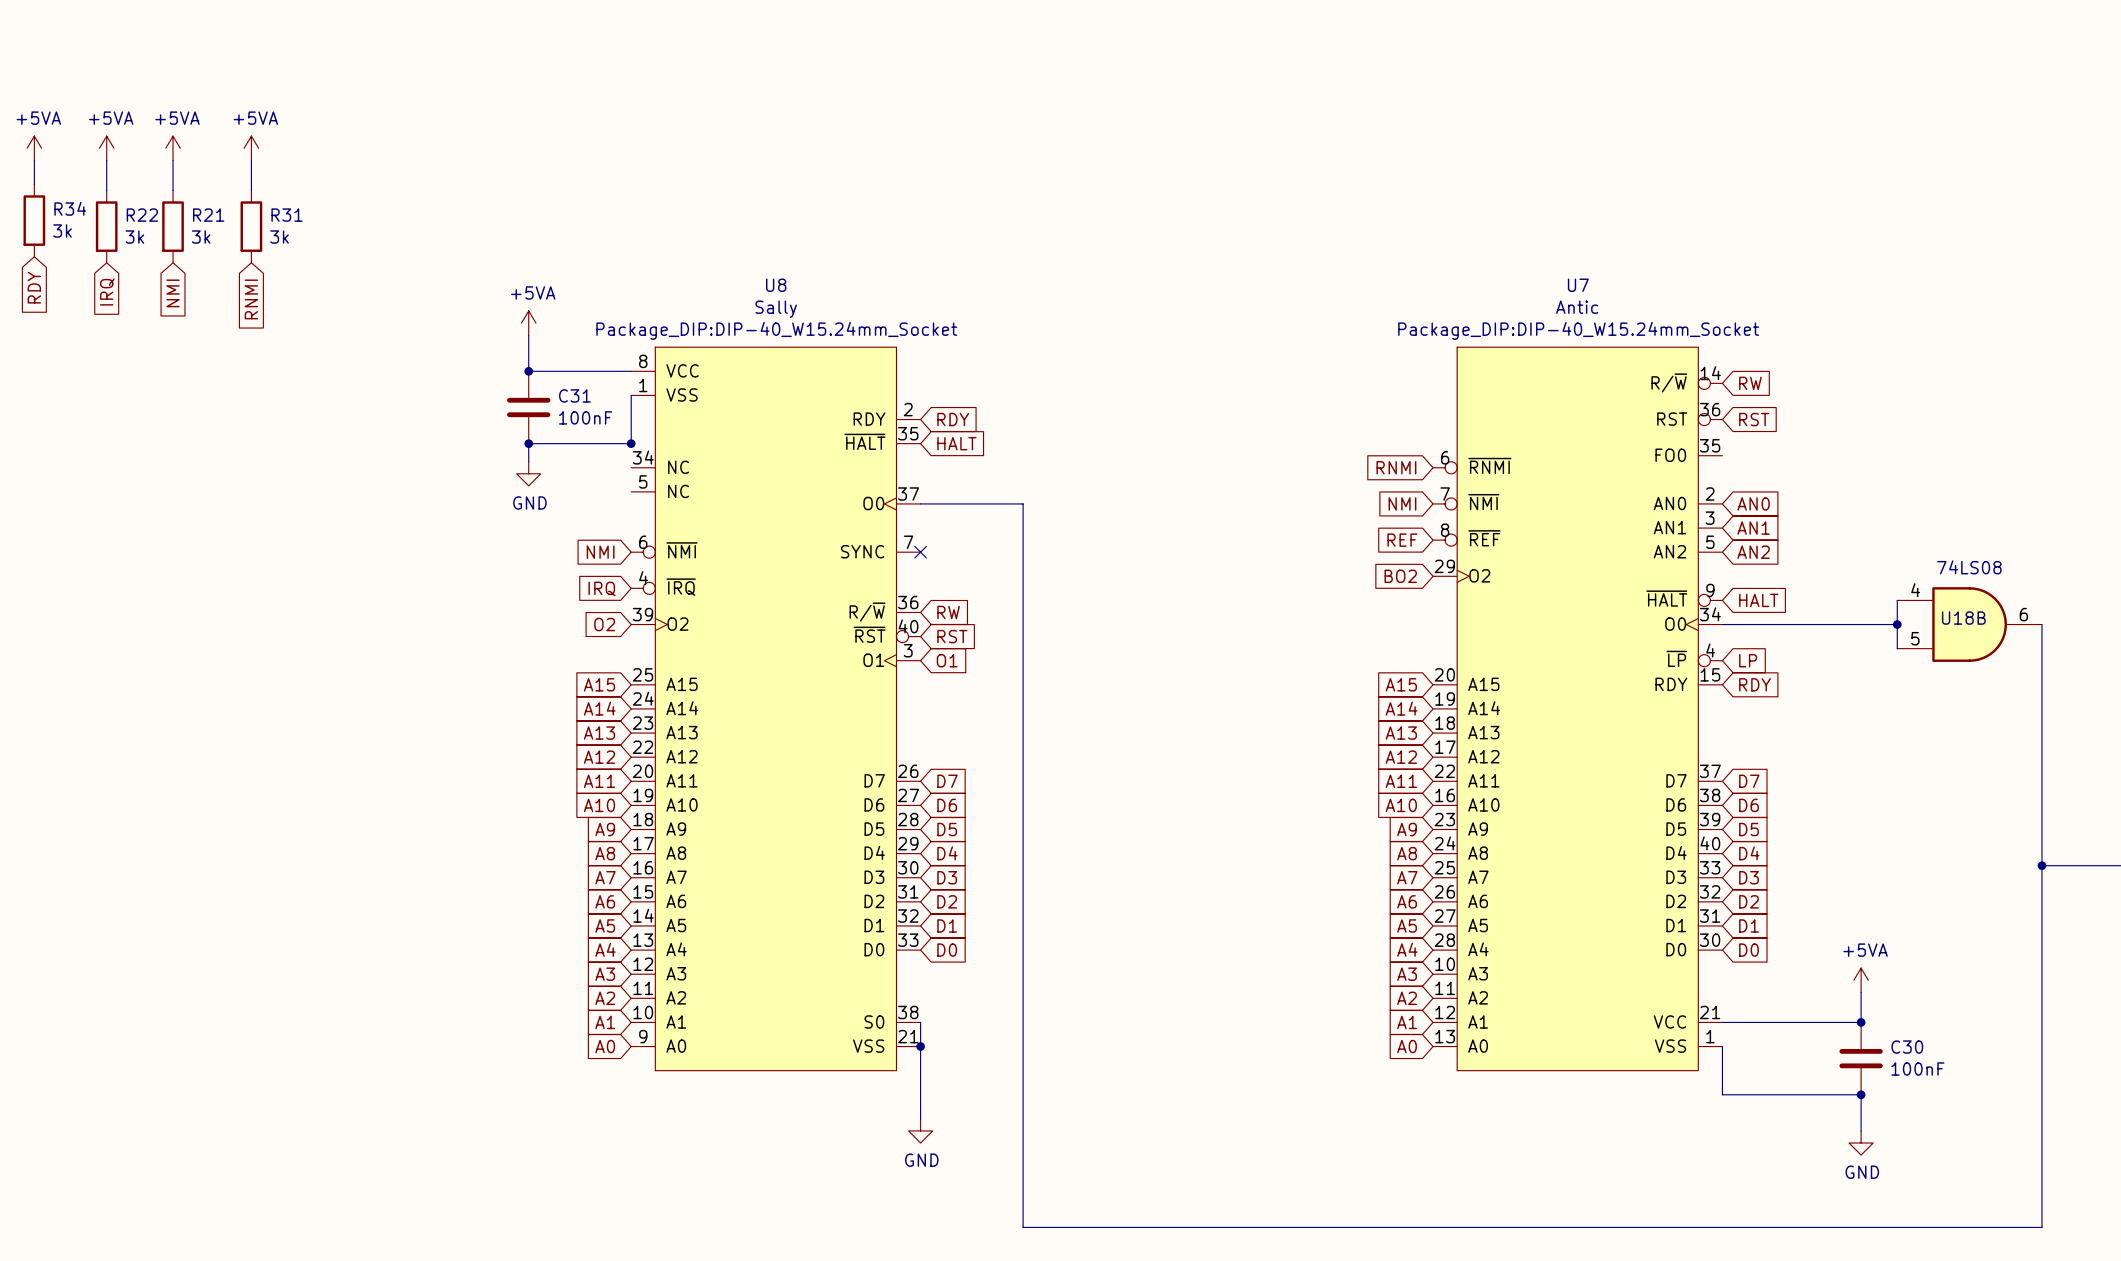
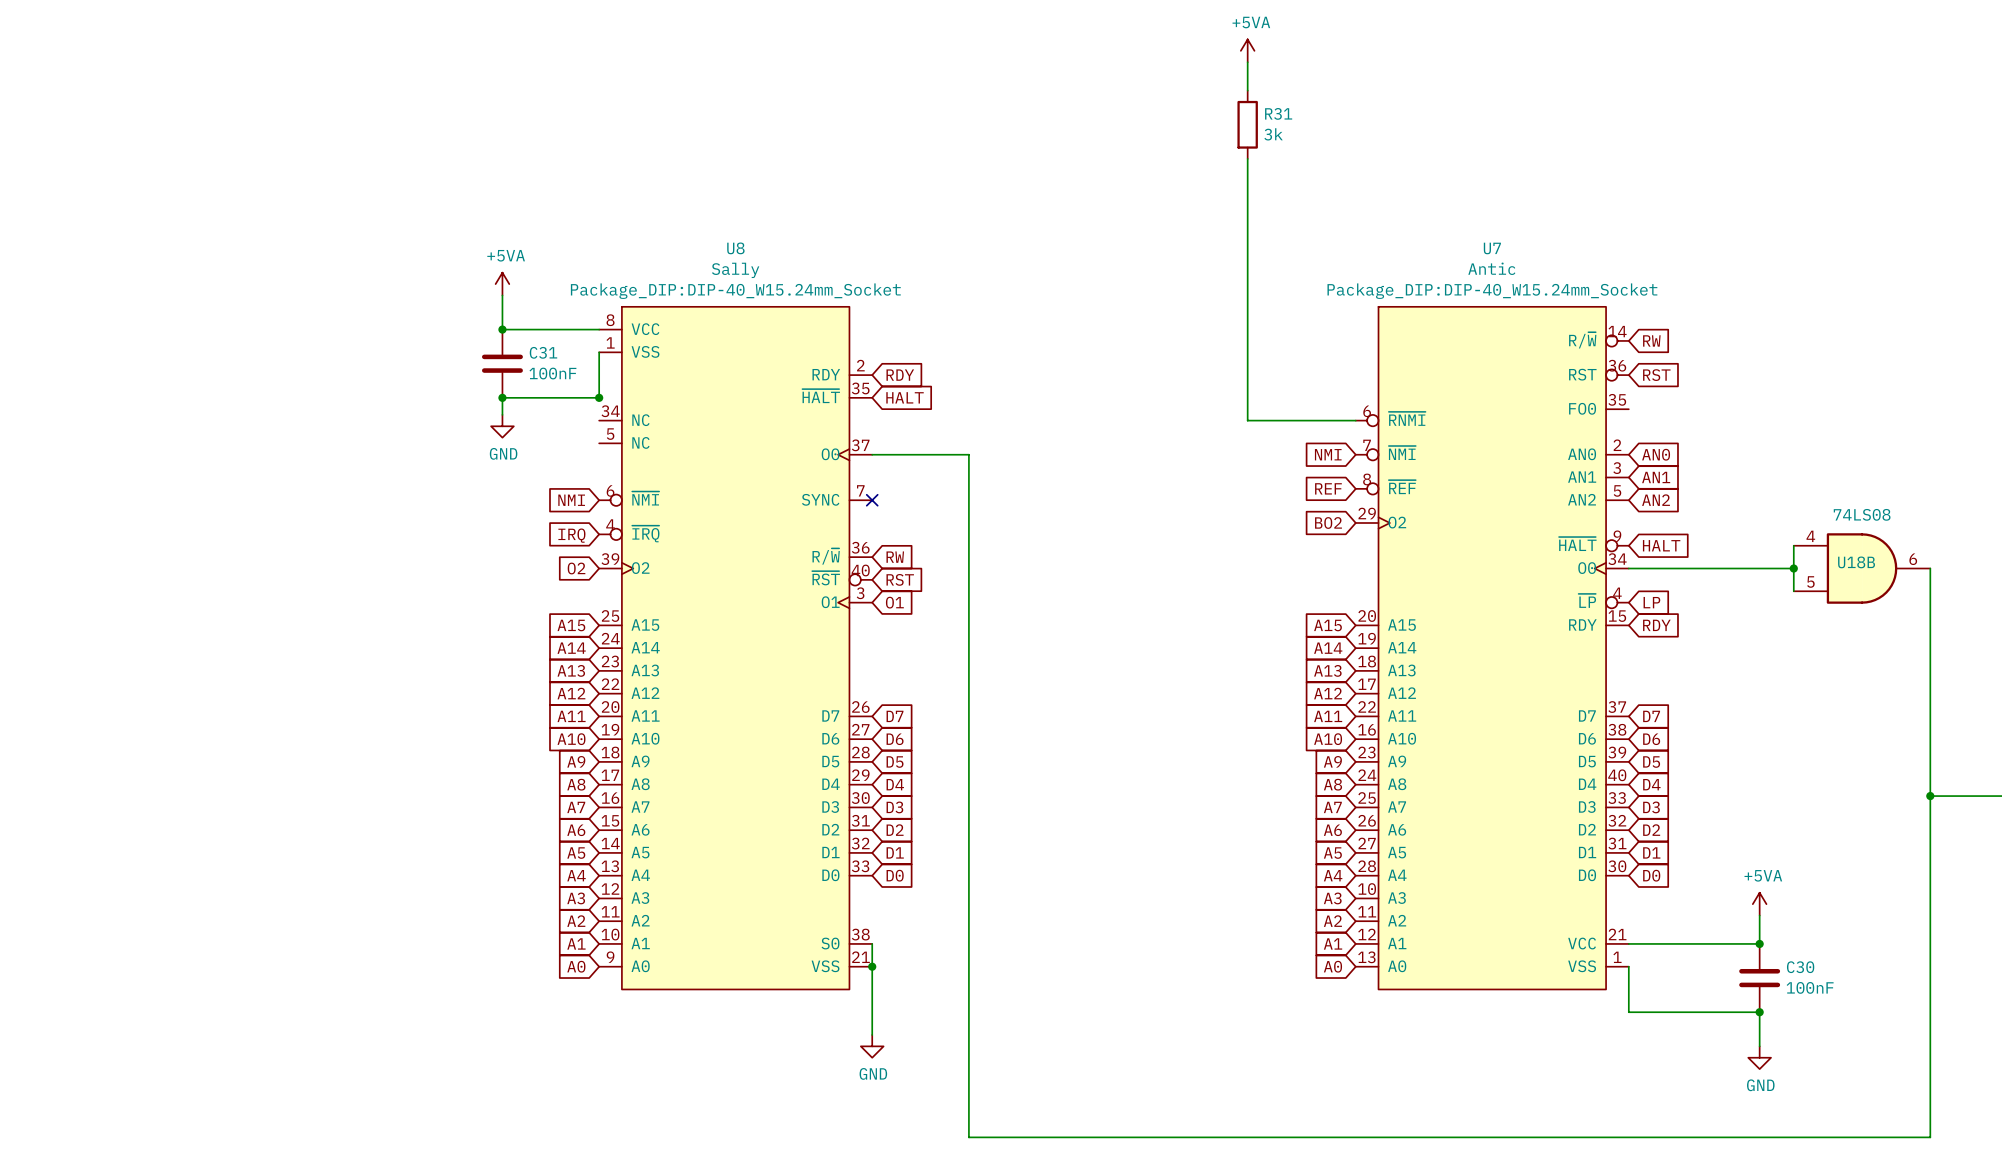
power symbol: none -> +5VA (1247, 50)
wire: none -> (1247, 62) (1247, 90)
power symbol: +5VA (34, 148) -> none
power symbol: +5VA (106, 148) -> none
power symbol: +5VA (173, 148) -> none
power symbol: +5VA (251, 148) -> none
wire: (34, 160) (34, 184) -> none
wire: (106, 160) (106, 190) -> none
wire: (173, 160) (173, 190) -> none
wire: (251, 160) (251, 190) -> none
wire: none -> (1247, 158) (1247, 420) (1355, 420)
R34: 3k (34, 220) -> none
R22: 3k (106, 226) -> none
R21: 3k (173, 226) -> none
R31 position: (251, 226) -> (1247, 124)
global label: RDY (34, 287) -> none
global label: IRQ (107, 291) -> none
global label: NMI (173, 293) -> none
global label: RNMI (251, 299) -> none
global label: RNMI (1396, 467) -> none

